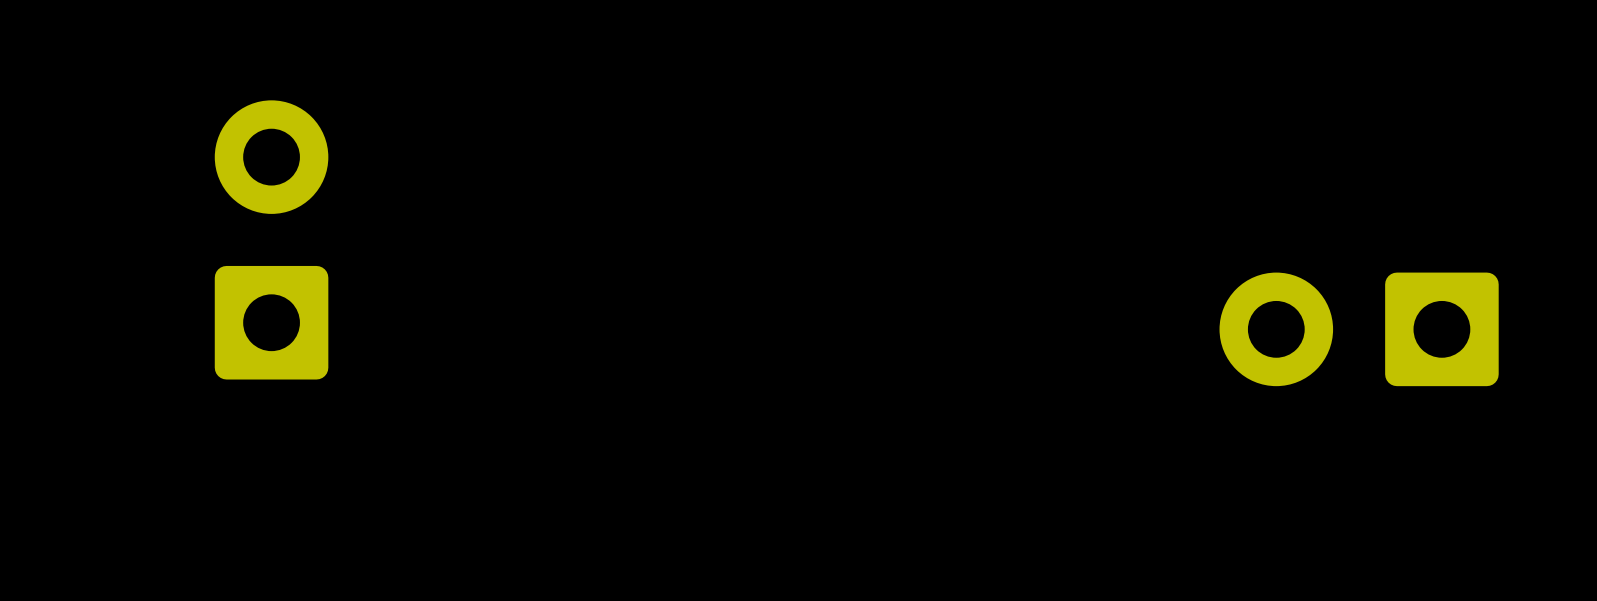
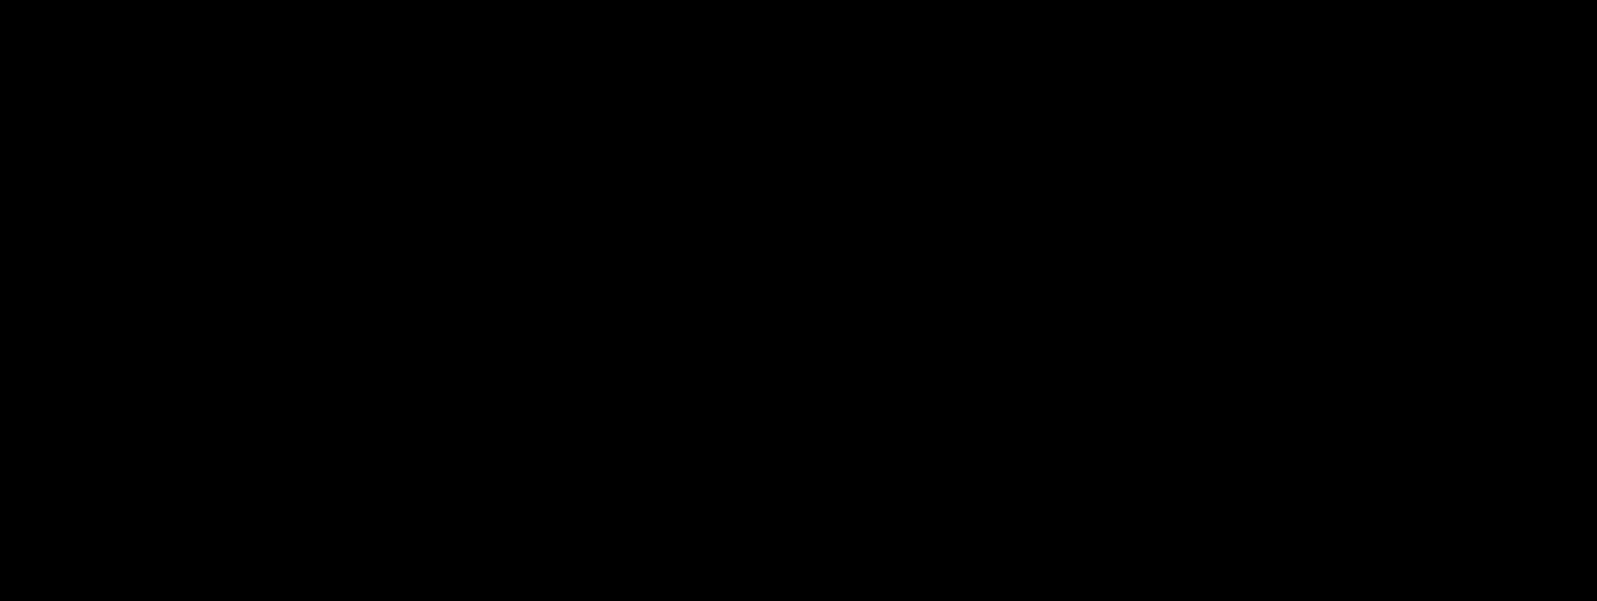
part: (271, 239) -> none
part: (1359, 329) -> none

